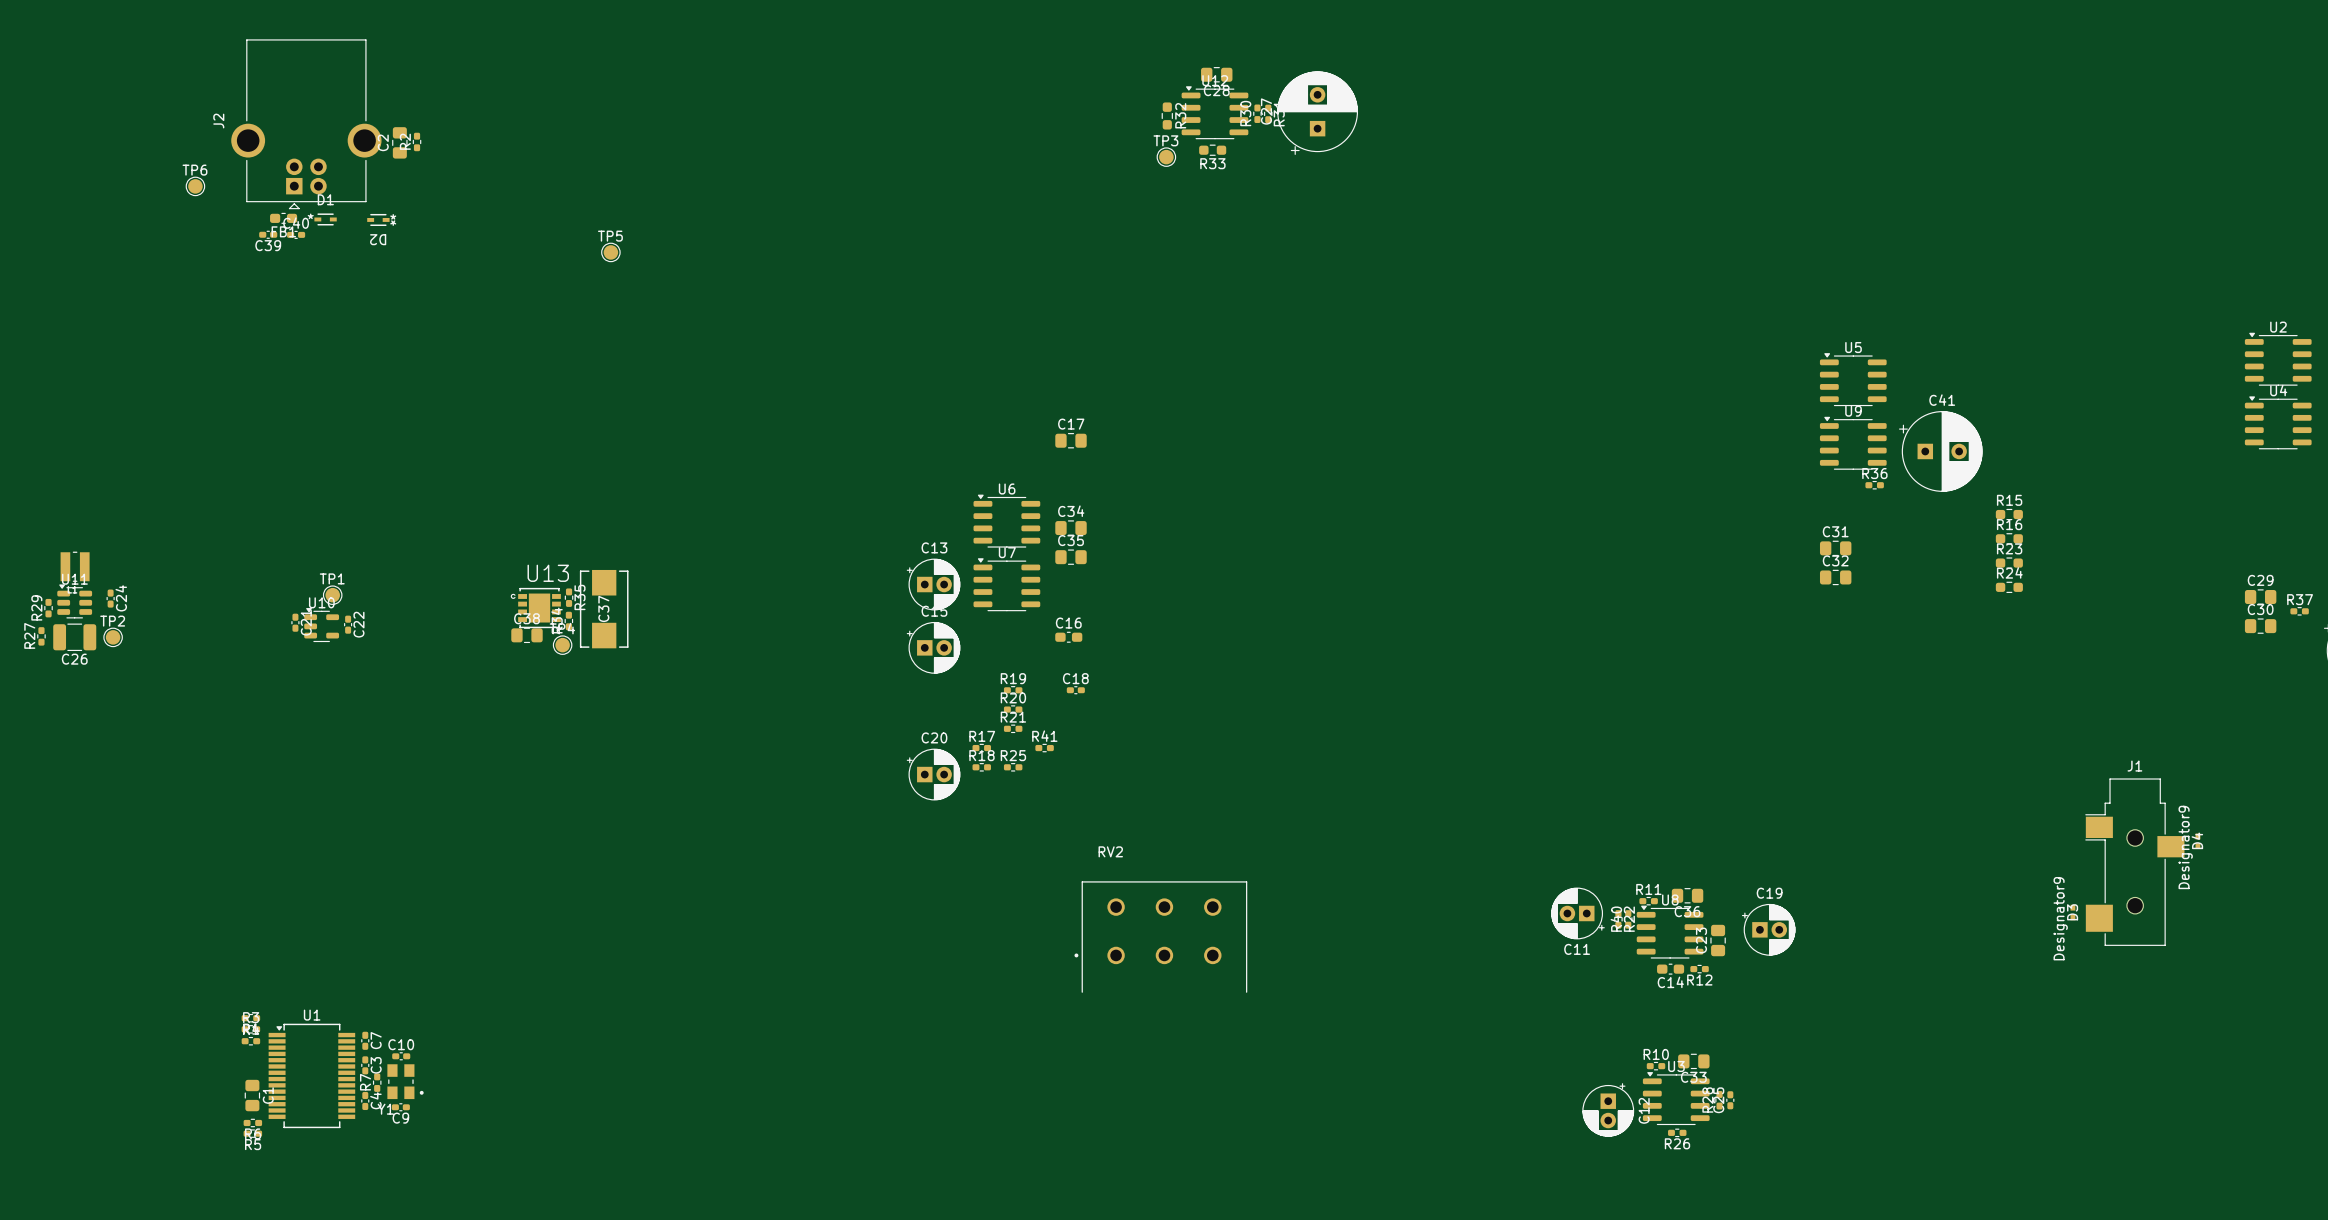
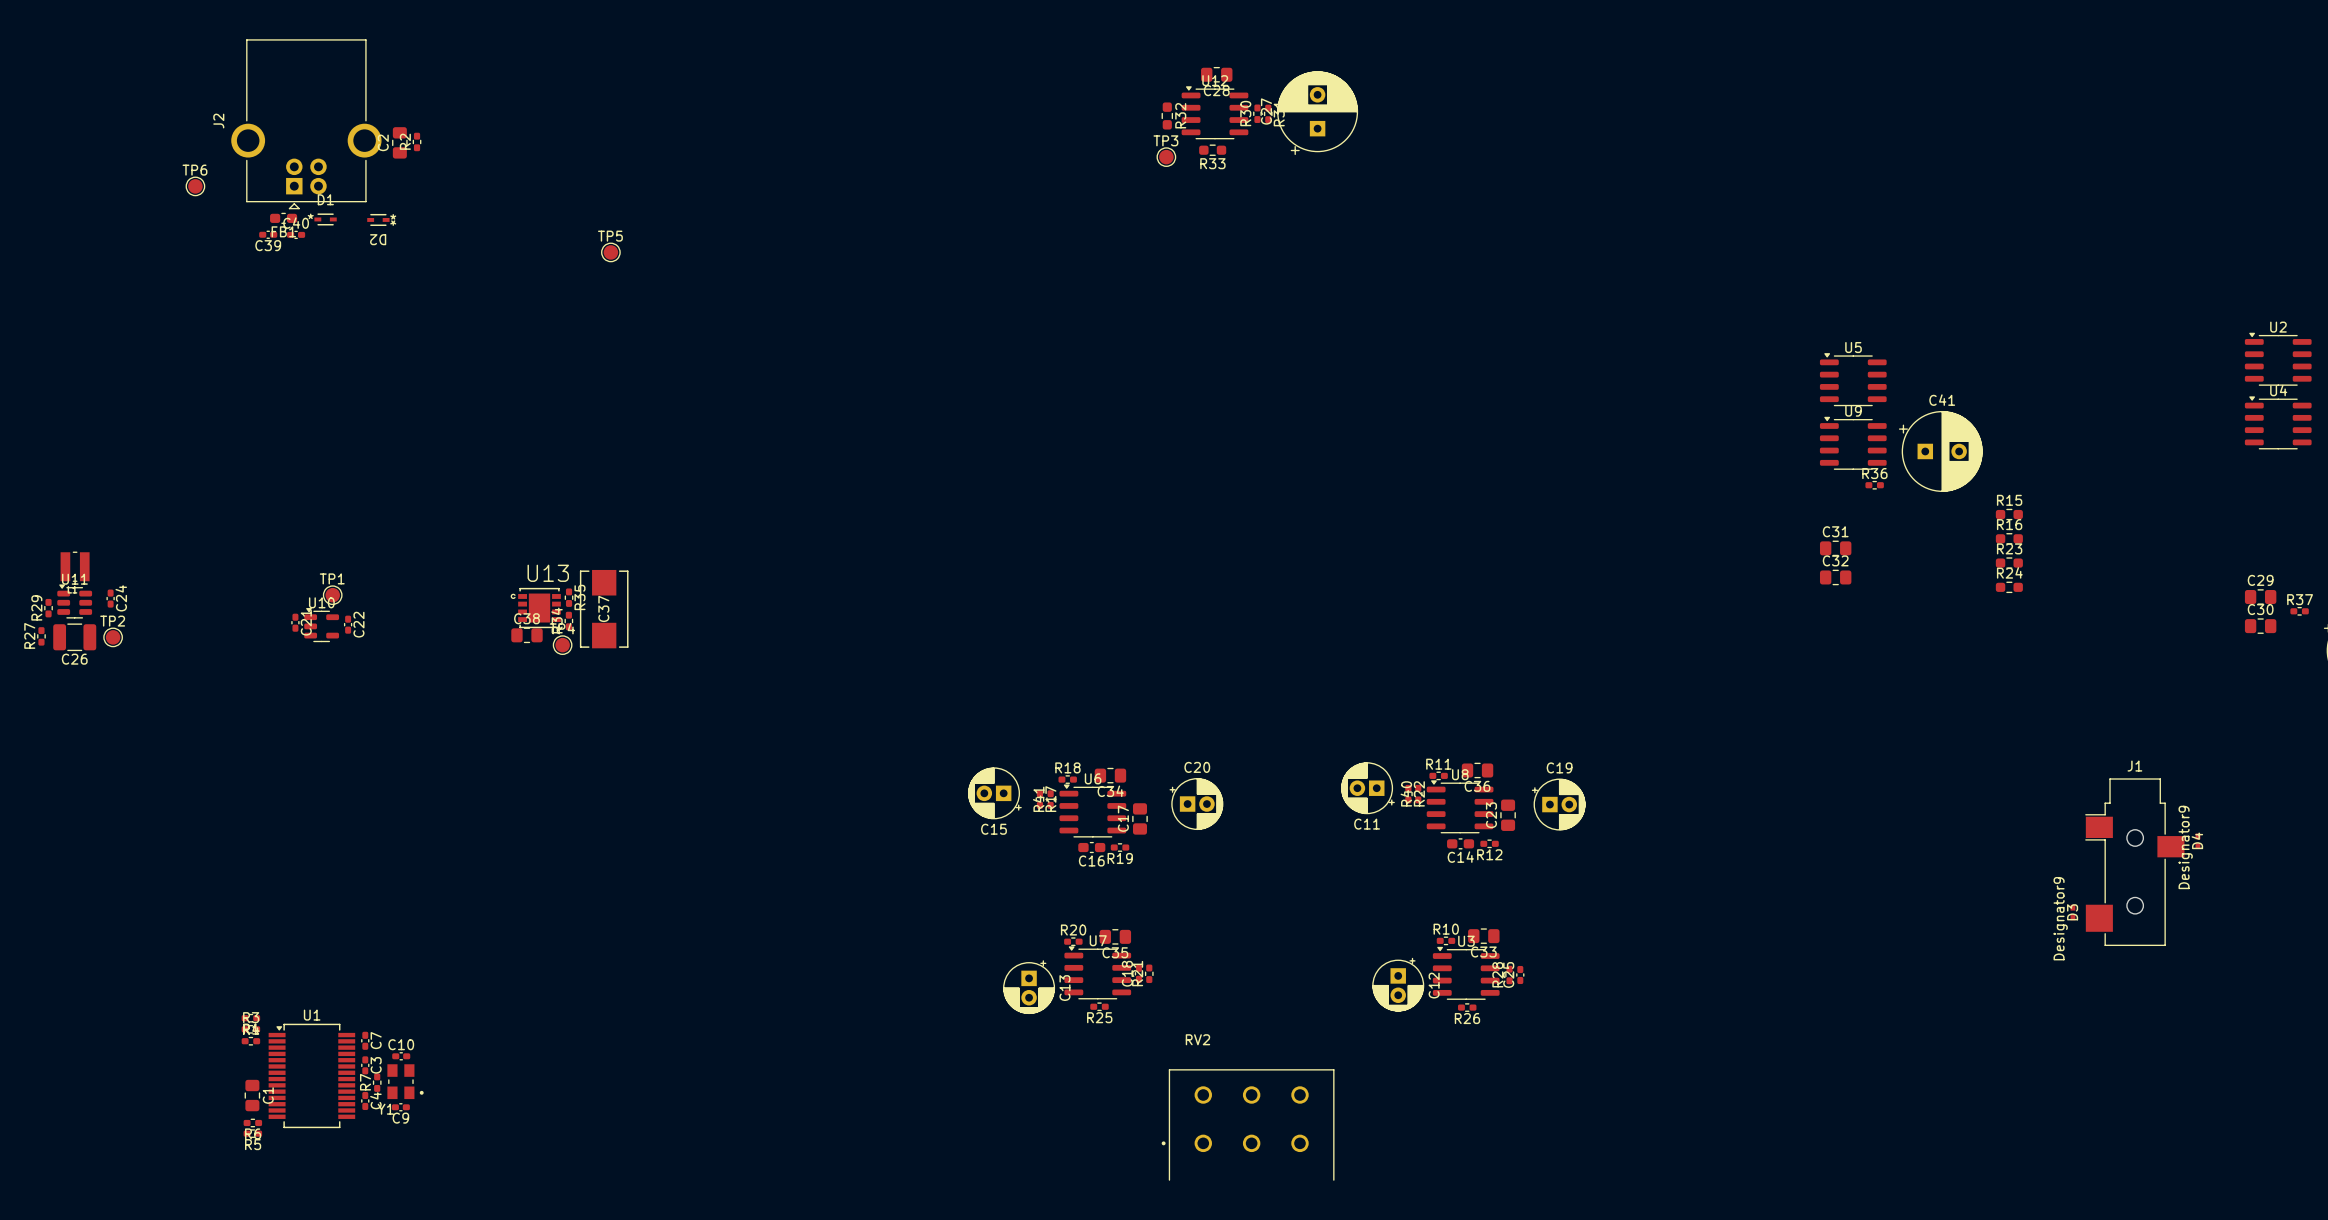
C17 name position: C17 (1071, 424) -> C17 (1123, 818)
C17 rotation: 0° (1071, 440) -> 90° clockwise (1139, 818)
C17 position: (1071, 440) -> (1139, 818)
C34 name position: C34 (1071, 511) -> C34 (1110, 791)
U6 position: (1006, 521) -> (1092, 810)
C34 position: (1071, 528) -> (1110, 775)
C35 name position: C35 (1071, 540) -> C35 (1115, 952)
C35 position: (1071, 557) -> (1115, 936)
C13 rotation: 0° (933, 584) -> 90° clockwise (1029, 987)
C13 position: (933, 584) -> (1029, 987)
U7 position: (1006, 584) -> (1097, 972)
C16 name position: C16 (1068, 623) -> C16 (1091, 861)
C16 position: (1068, 637) -> (1091, 847)
C15 rotation: 0° (933, 647) -> 180° (994, 793)
C15 position: (933, 647) -> (994, 793)
R19 name position: R19 (1013, 678) -> R19 (1120, 858)
R19 position: (1013, 690) -> (1120, 847)
C18 rotation: 0° (1075, 690) -> 90° clockwise (1138, 973)
C18 position: (1075, 690) -> (1138, 973)
R20 position: (1013, 709) -> (1073, 941)
R21 rotation: 0° (1013, 728) -> 90° clockwise (1149, 973)
R21 position: (1013, 728) -> (1149, 973)
R17 rotation: 0° (981, 748) -> 90° clockwise (1039, 799)
R17 position: (981, 748) -> (1039, 799)
R41 rotation: 0° (1044, 748) -> 90° clockwise (1050, 799)
R41 position: (1044, 748) -> (1050, 799)
R25 name position: R25 (1013, 755) -> R25 (1099, 1017)
R18 position: (981, 767) -> (1067, 779)
R25 position: (1013, 767) -> (1099, 1006)
C20 position: (933, 774) -> (1196, 804)
C36 position: (1687, 895) -> (1477, 770)
R11 position: (1648, 901) -> (1438, 775)
C11 position: (1577, 913) -> (1367, 788)
R22 position: (1618, 919) -> (1408, 794)
R40 position: (1628, 919) -> (1418, 794)
C19 position: (1768, 929) -> (1558, 804)
U8 position: (1670, 932) -> (1460, 806)
RV2 position: (1160, 937) -> (1248, 1124)
C23 position: (1718, 940) -> (1508, 815)
C14 position: (1670, 969) -> (1460, 843)
R12 position: (1699, 969) -> (1489, 843)
C33 position: (1693, 1061) -> (1483, 936)
R10 position: (1656, 1066) -> (1445, 940)
U3 position: (1676, 1098) -> (1466, 973)
R28 position: (1719, 1100) -> (1509, 974)
C25 position: (1730, 1100) -> (1520, 974)
C12 position: (1608, 1109) -> (1398, 984)
R26 position: (1677, 1132) -> (1467, 1007)

